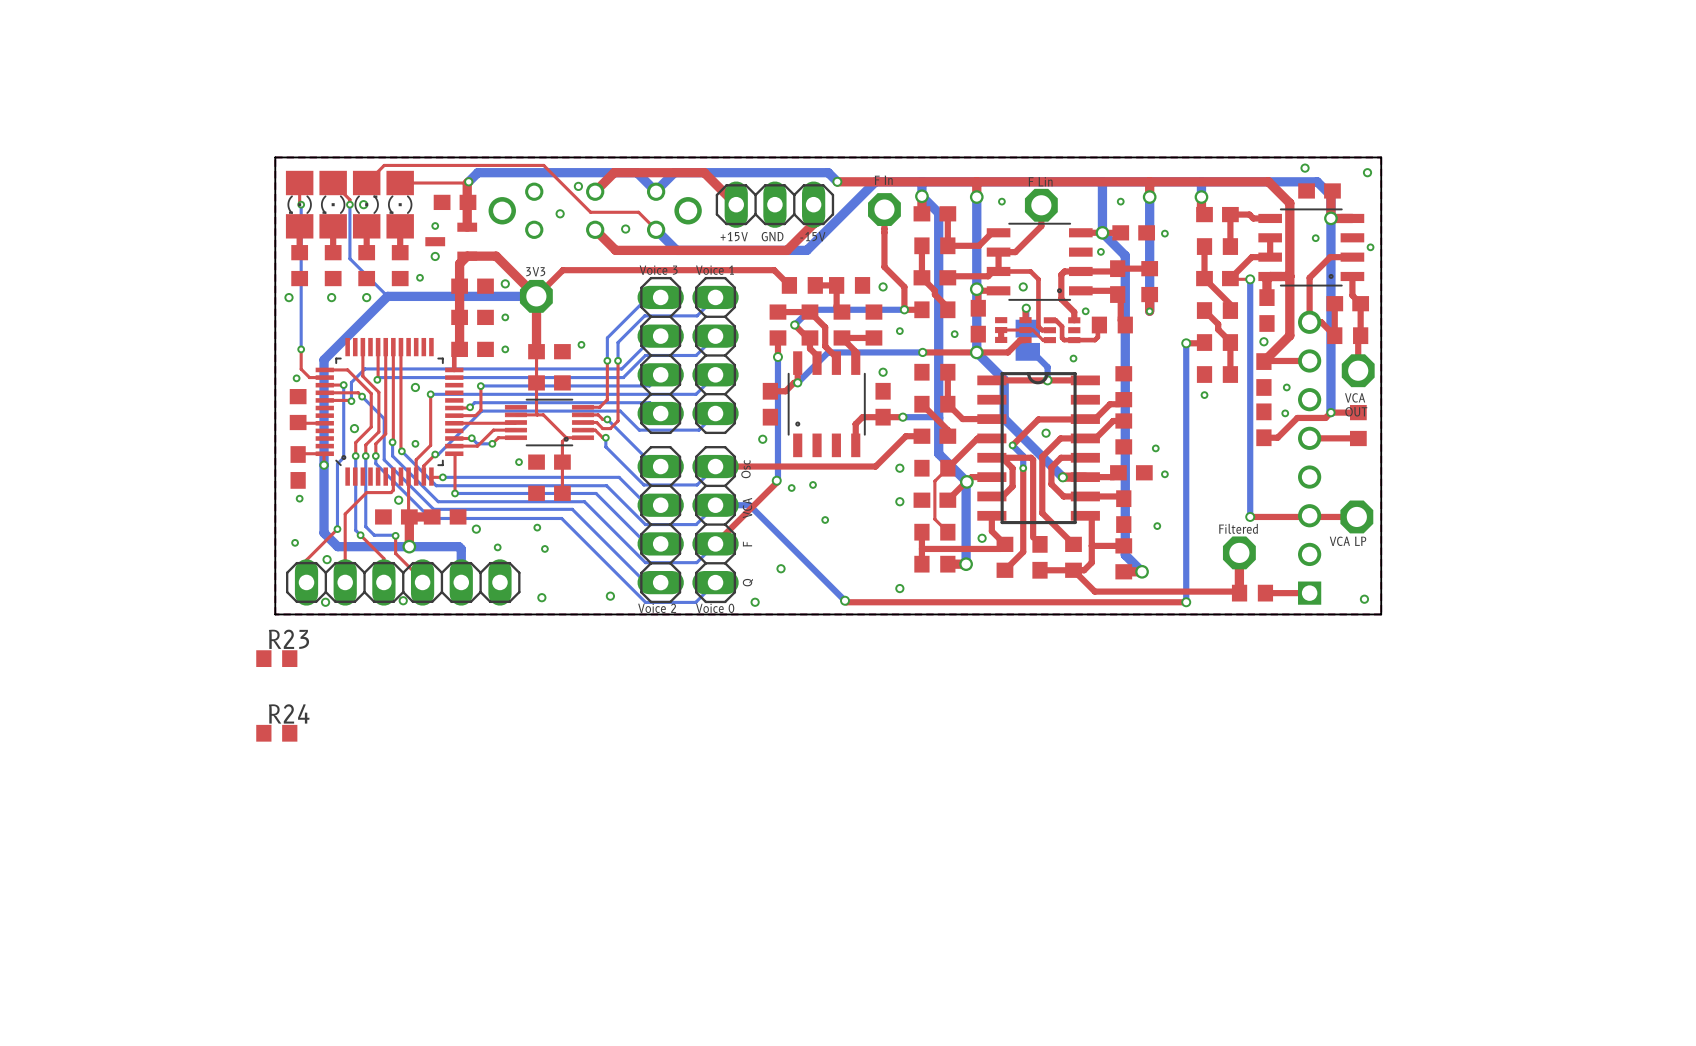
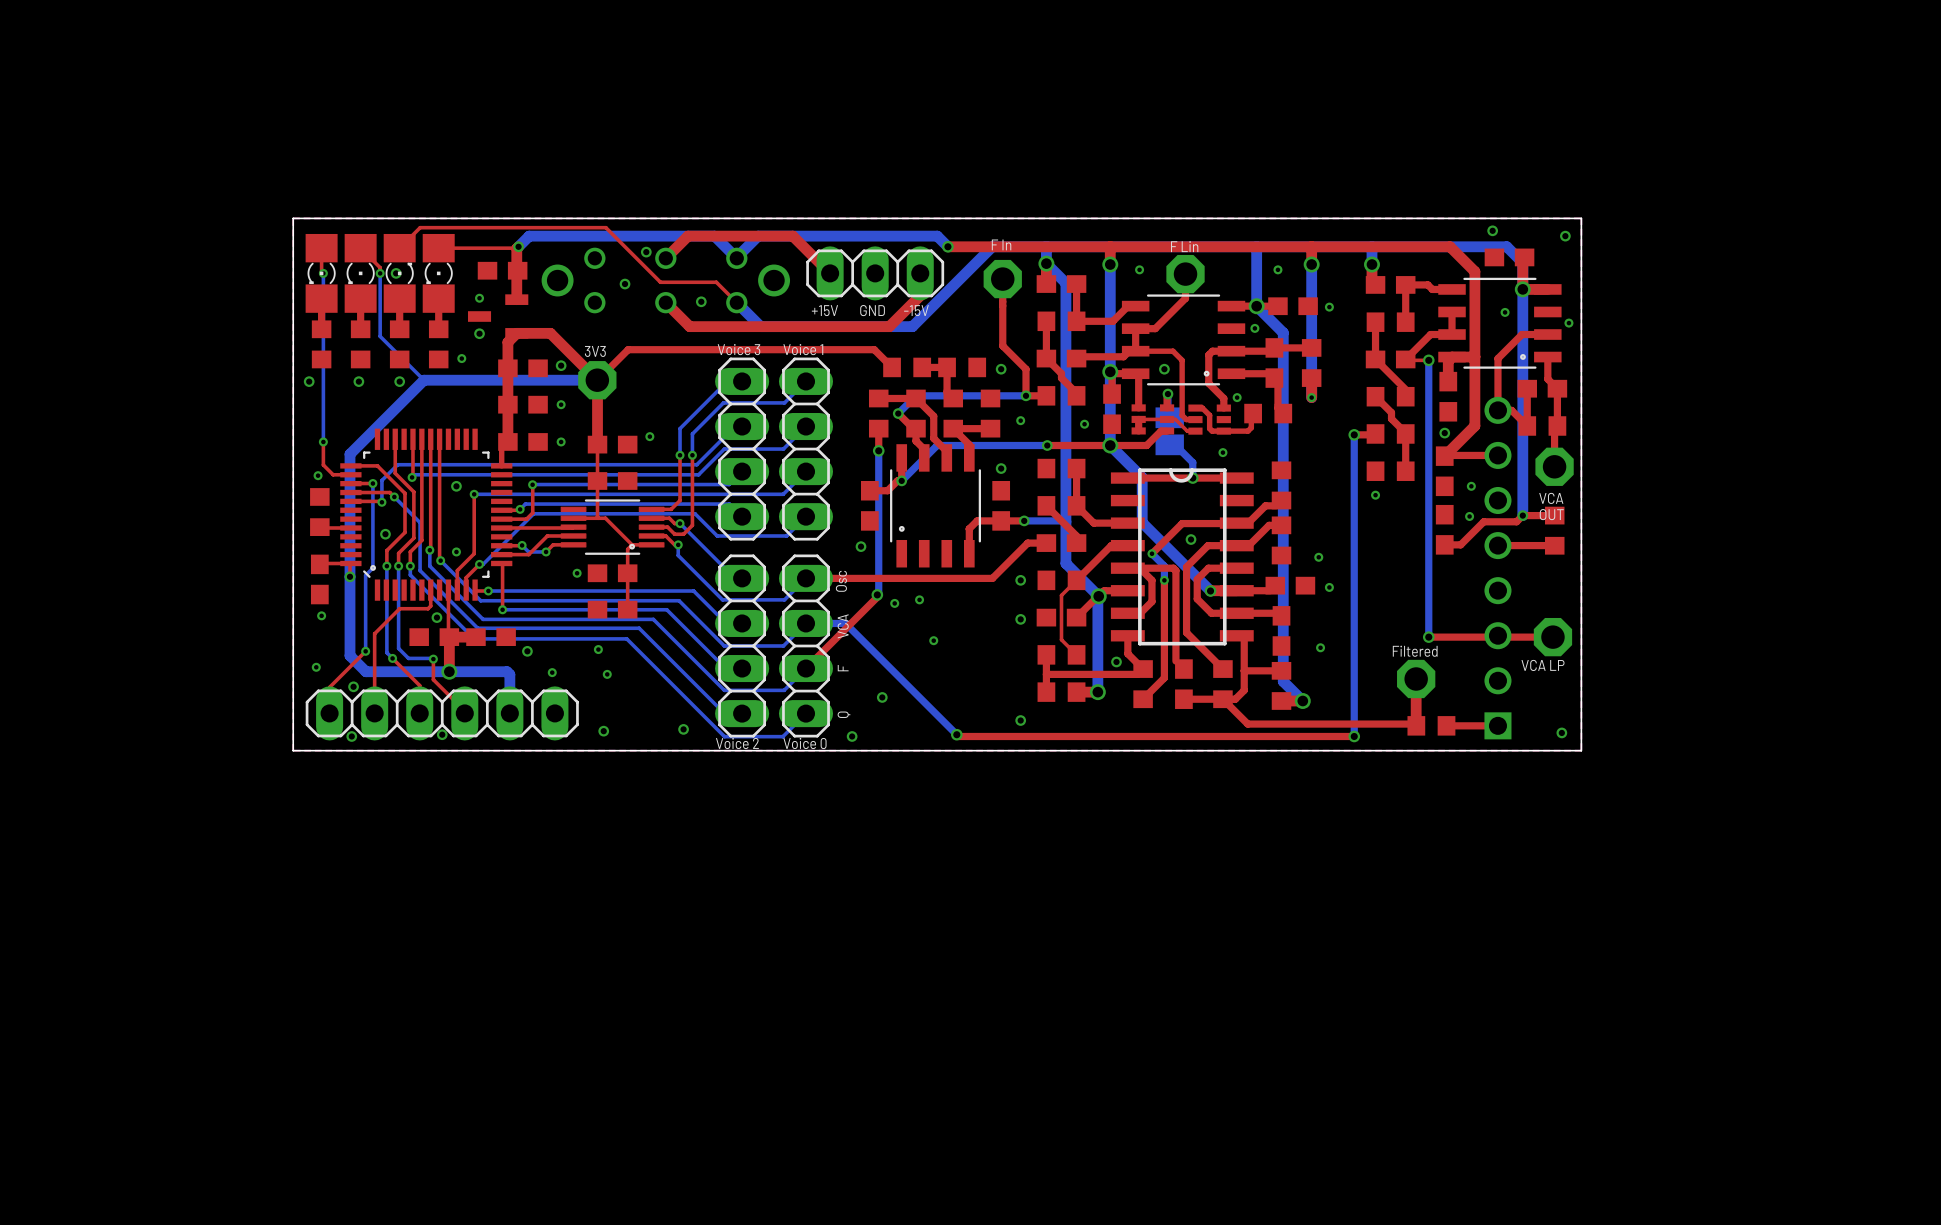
top track: none -> (1138, 376) (1138, 407)
R23: (276, 658) -> none
R24: (276, 733) -> none

